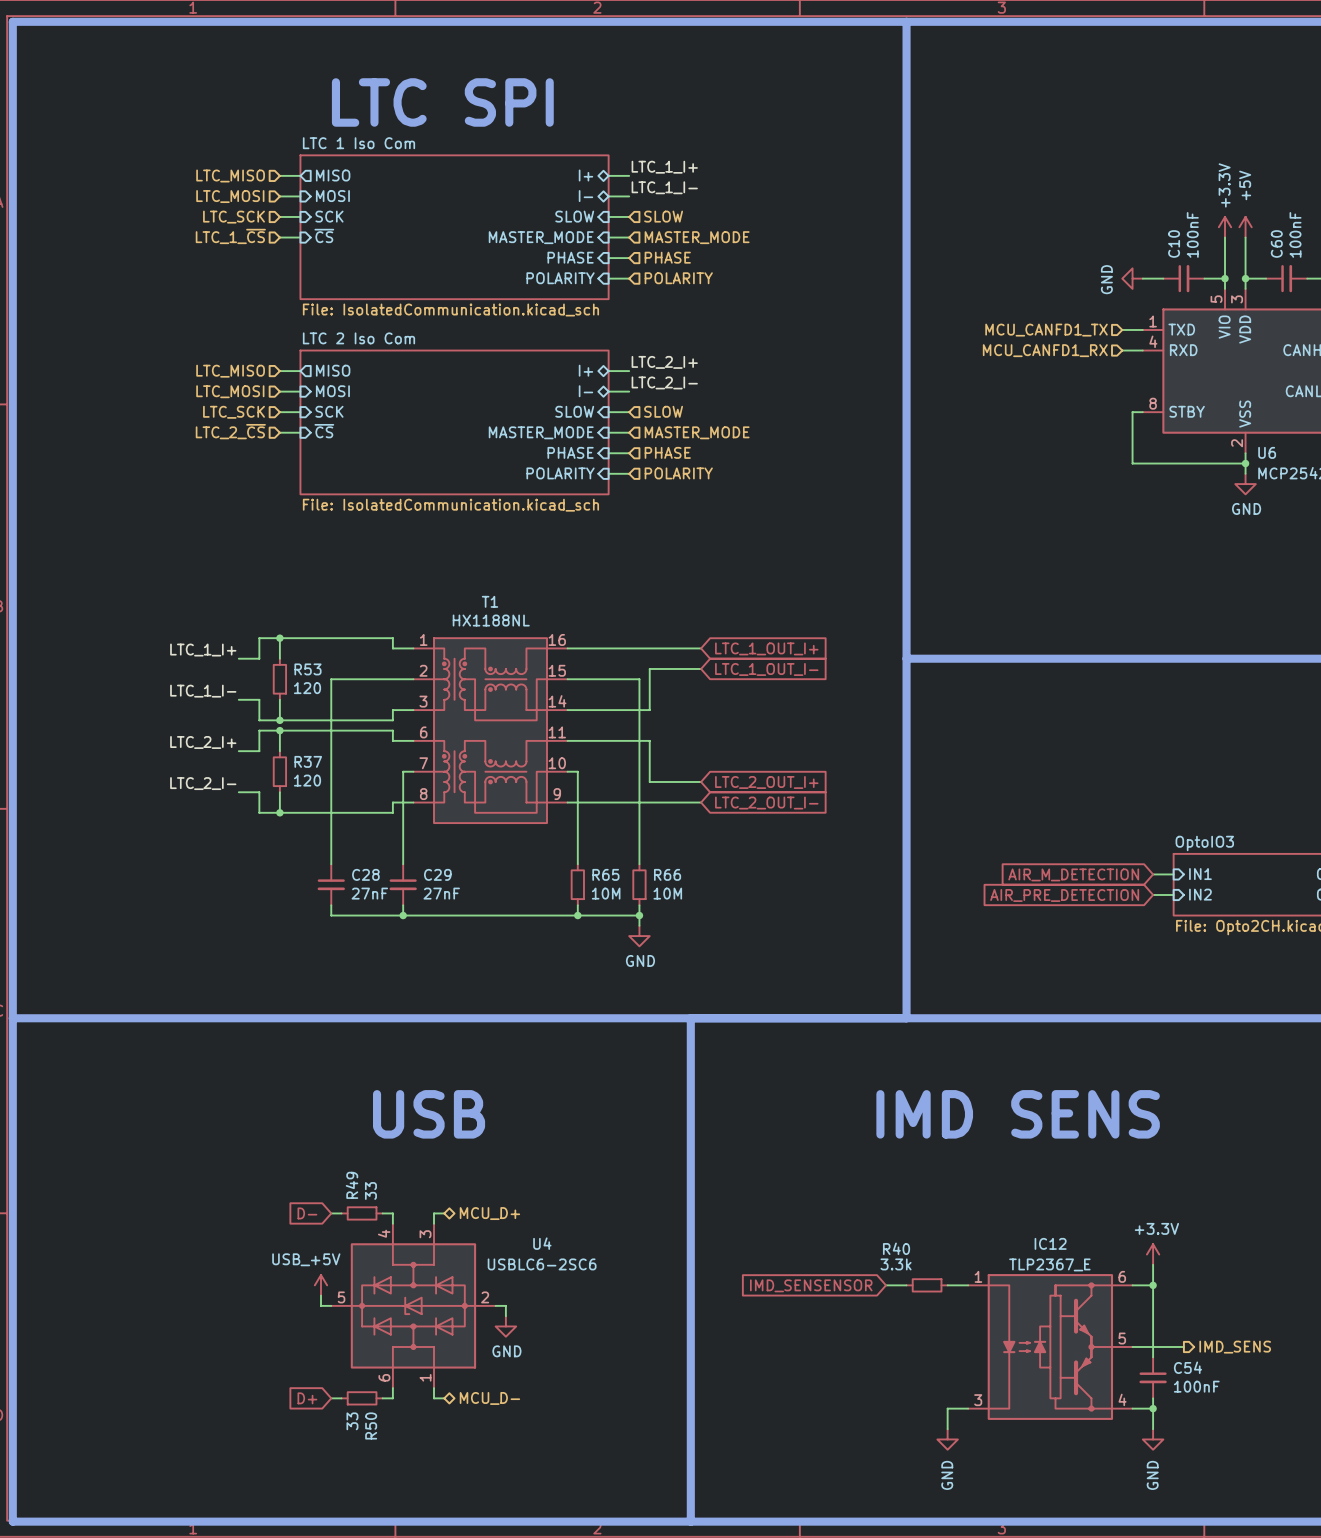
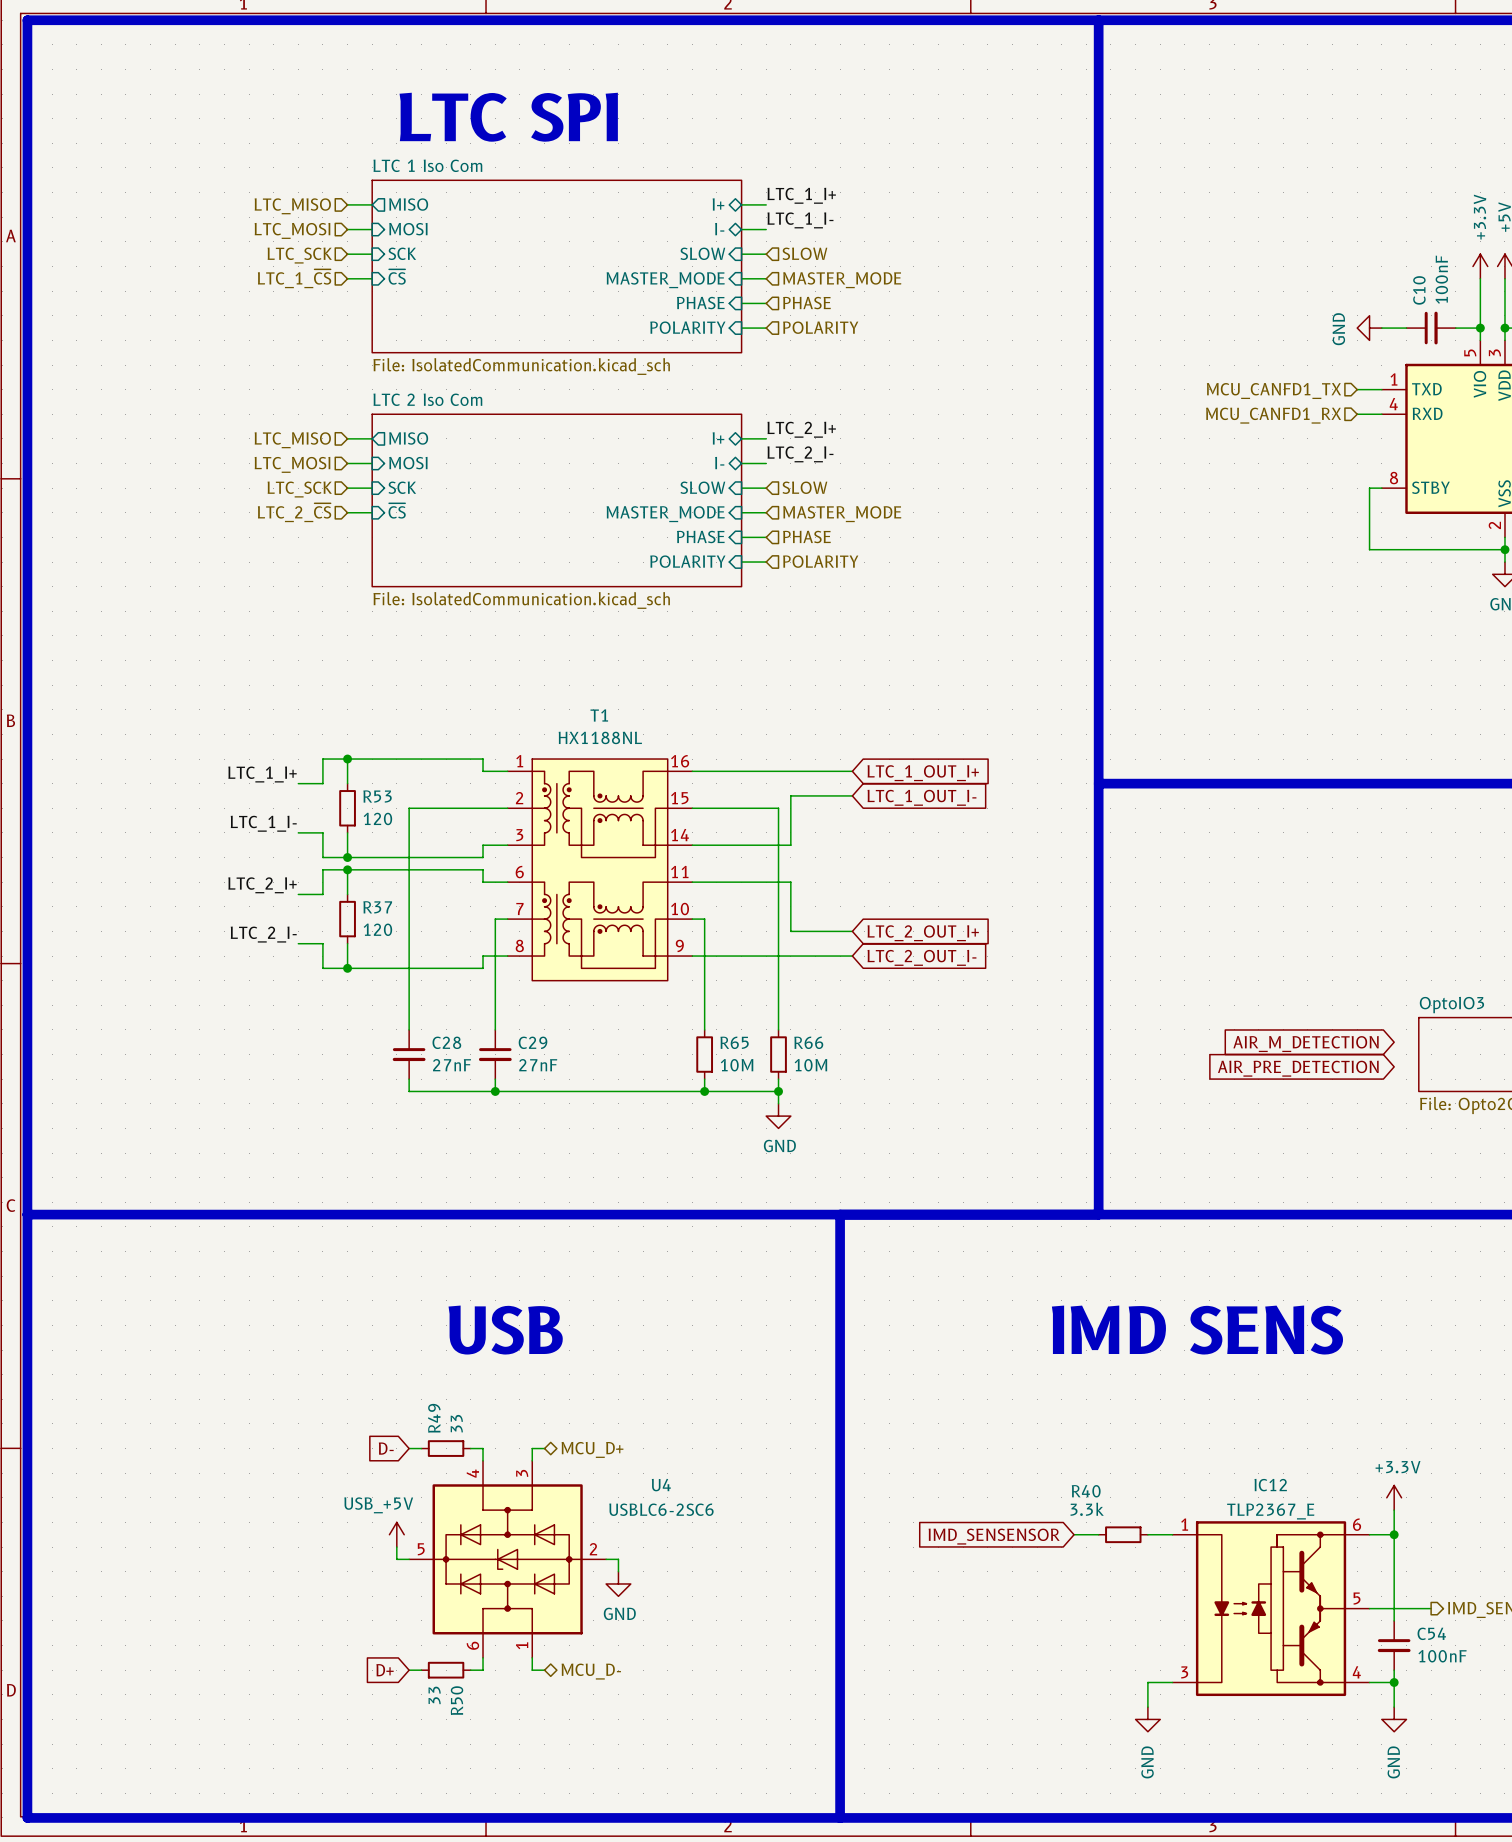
wire: (1153, 874) (1173, 874) -> none
sheet pin: IN1 (1200, 874) -> none
wire: (1153, 894) (1173, 894) -> none
sheet pin: IN2 (1200, 894) -> none

